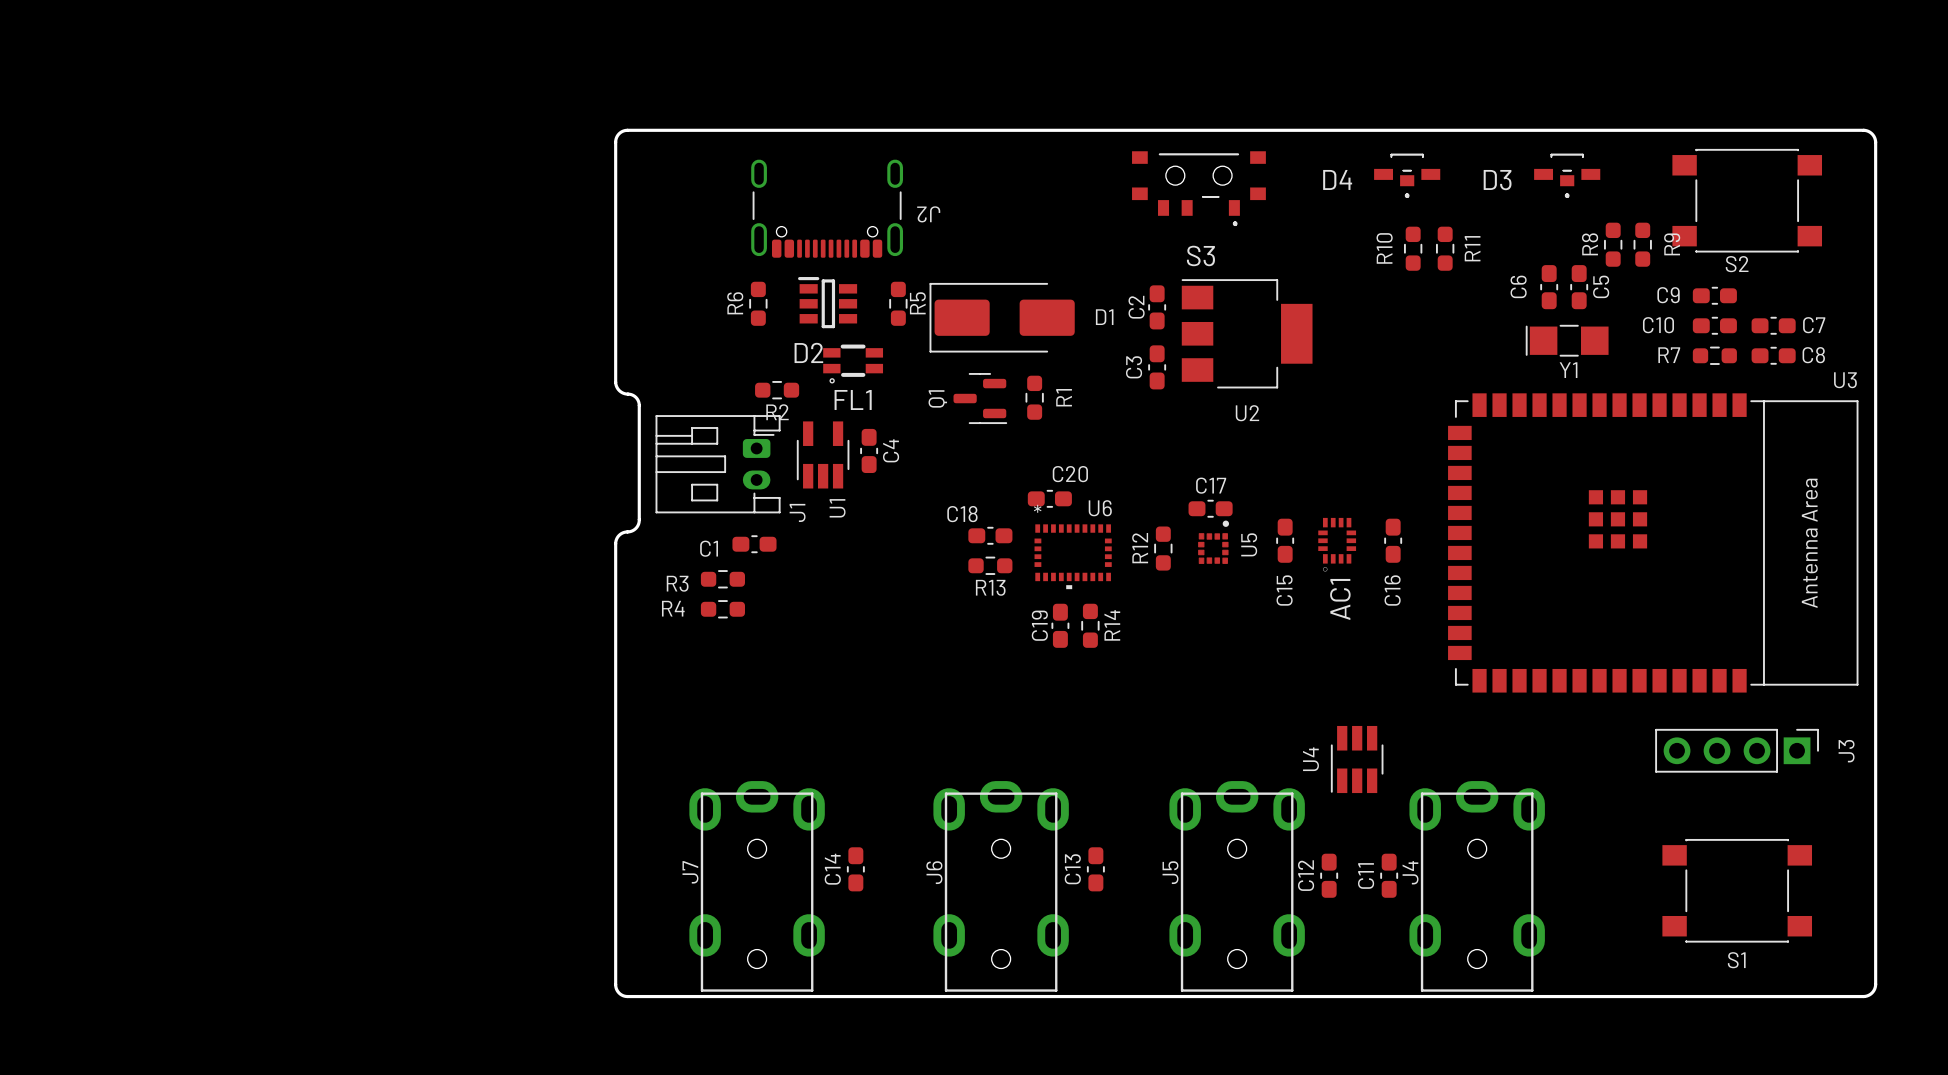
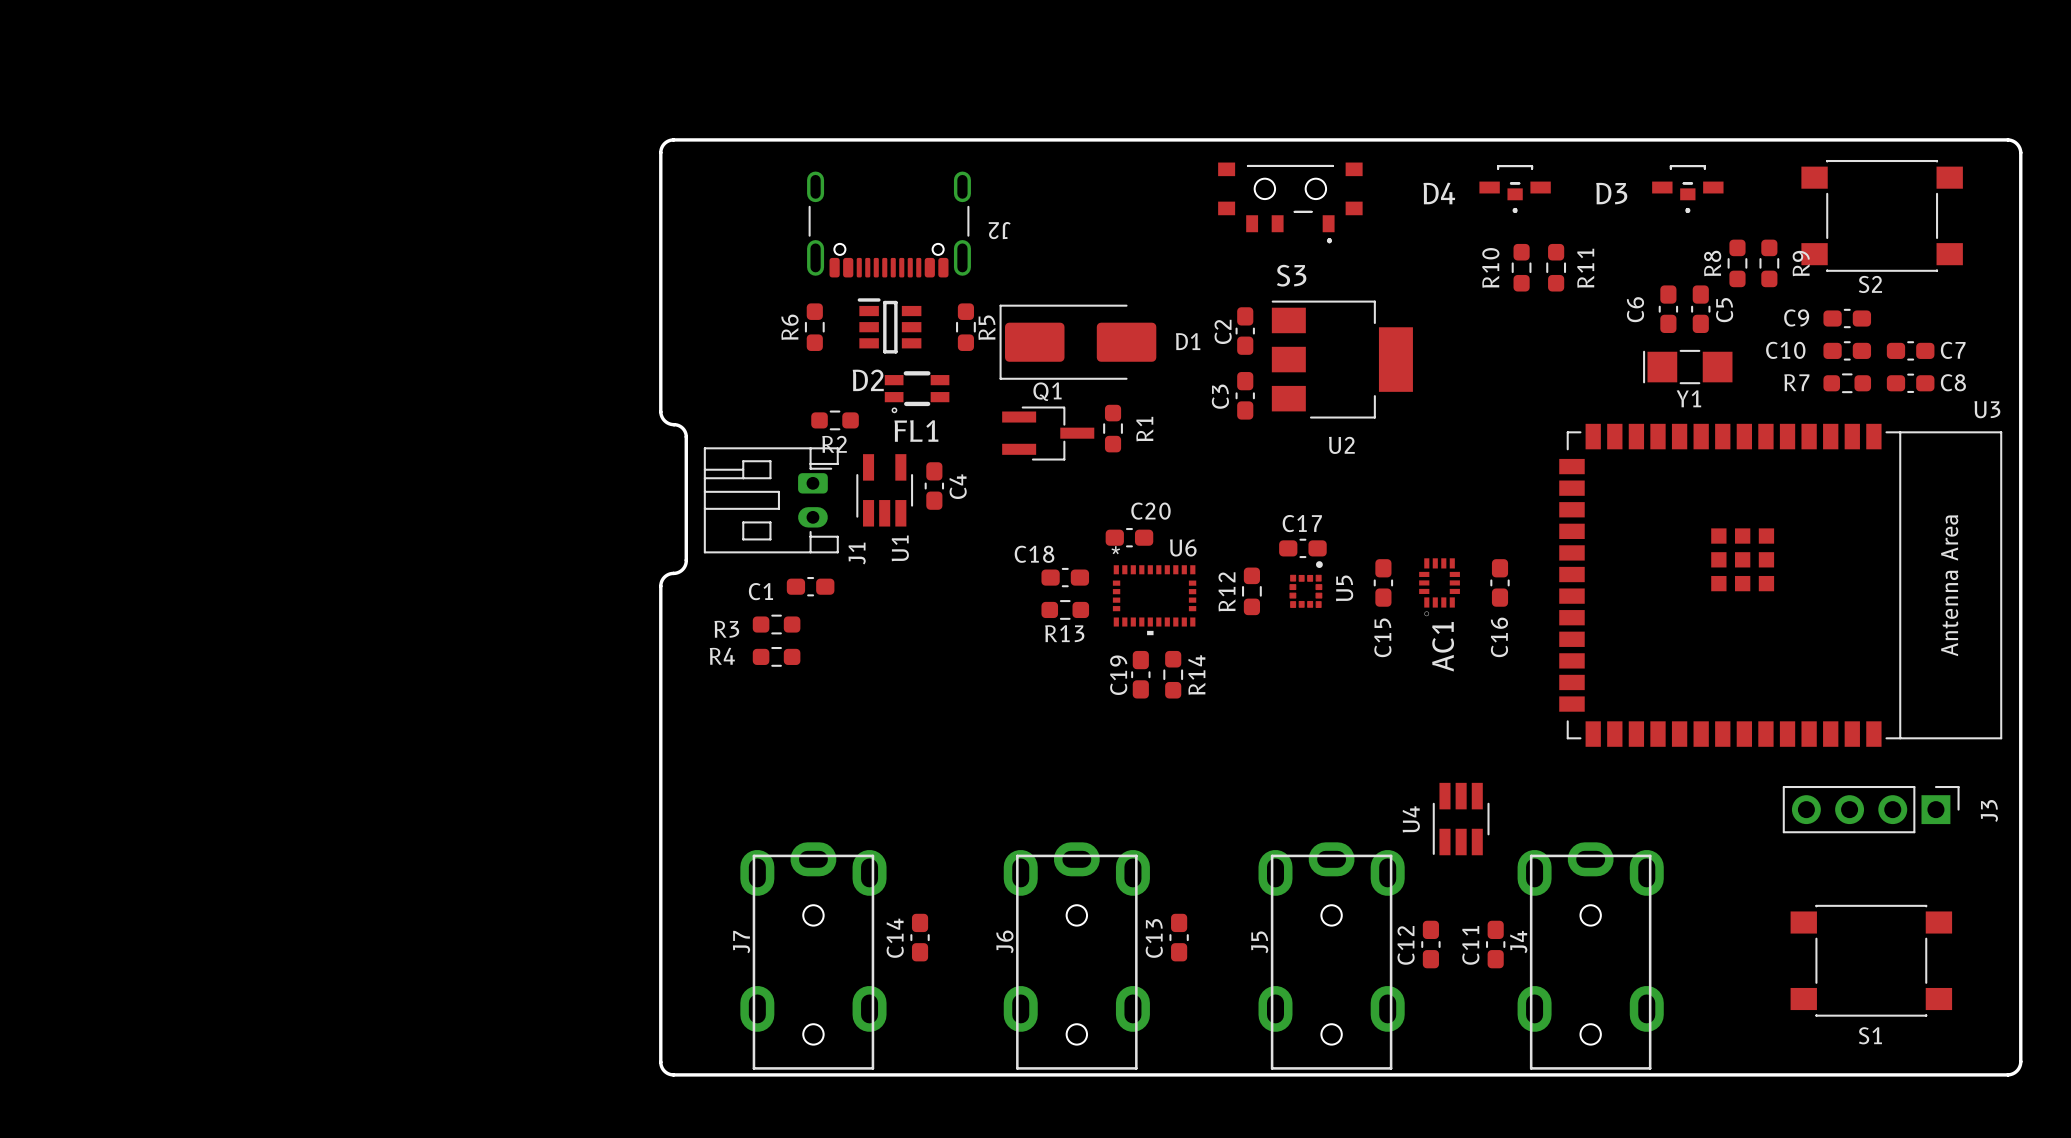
Q1 footprint: [953, 373, 1008, 425] -> [1002, 406, 1095, 461]
Q1 name position: Q1 (937, 398) -> Q1 (1047, 391)

